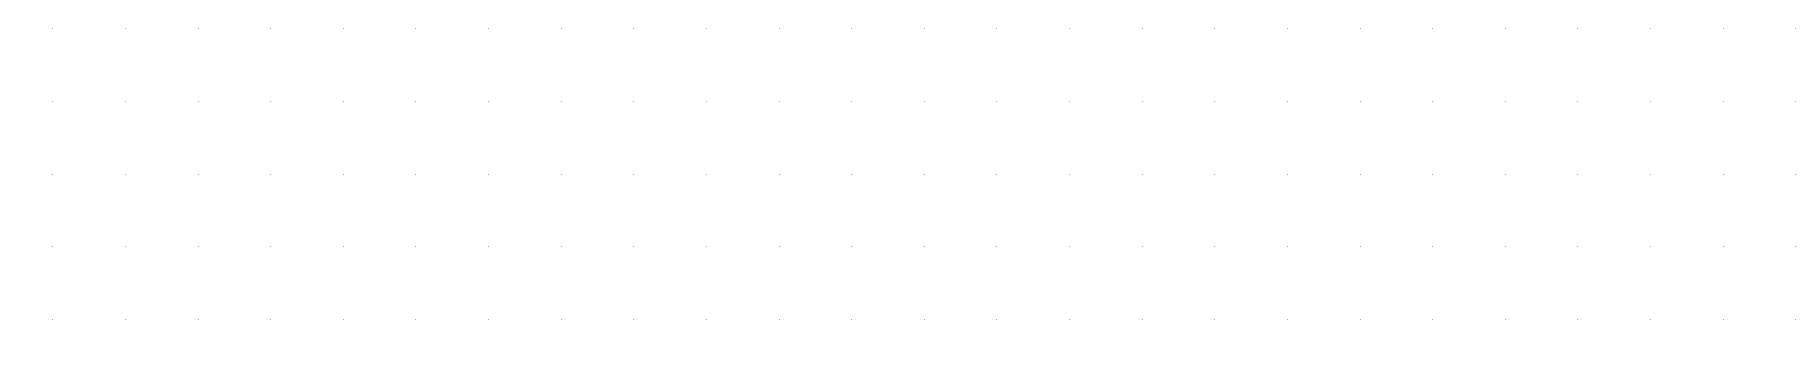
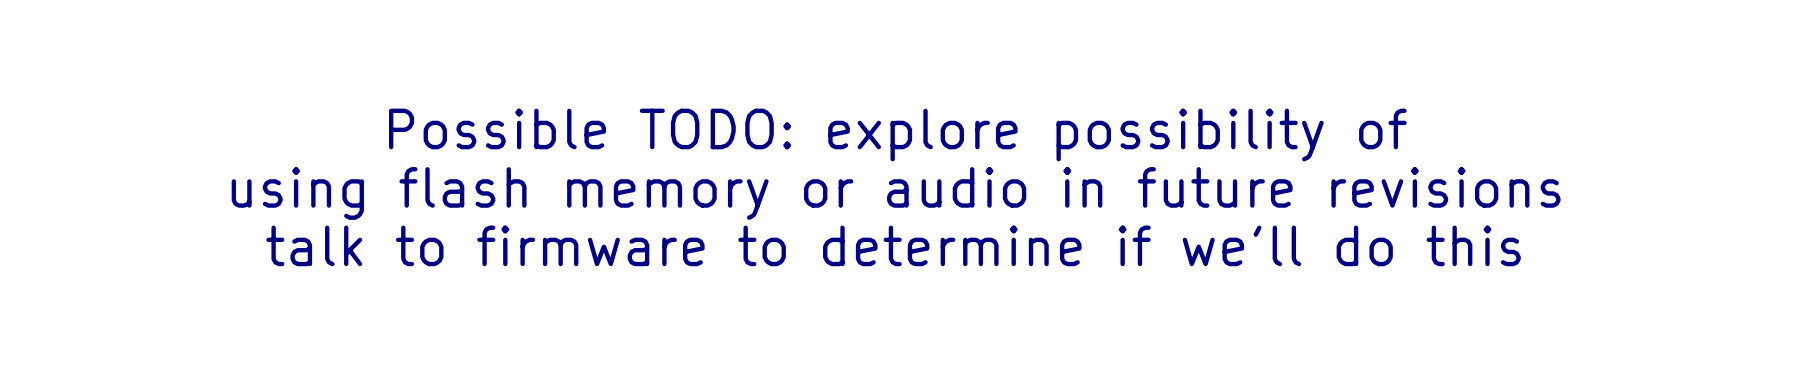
text: none -> Possible TODO: explore possibility of (897, 135)
text: none -> using flash memory or audio in future revisions (896, 193)
text: none -> talk to firmware to determine if we'll do this (893, 245)

